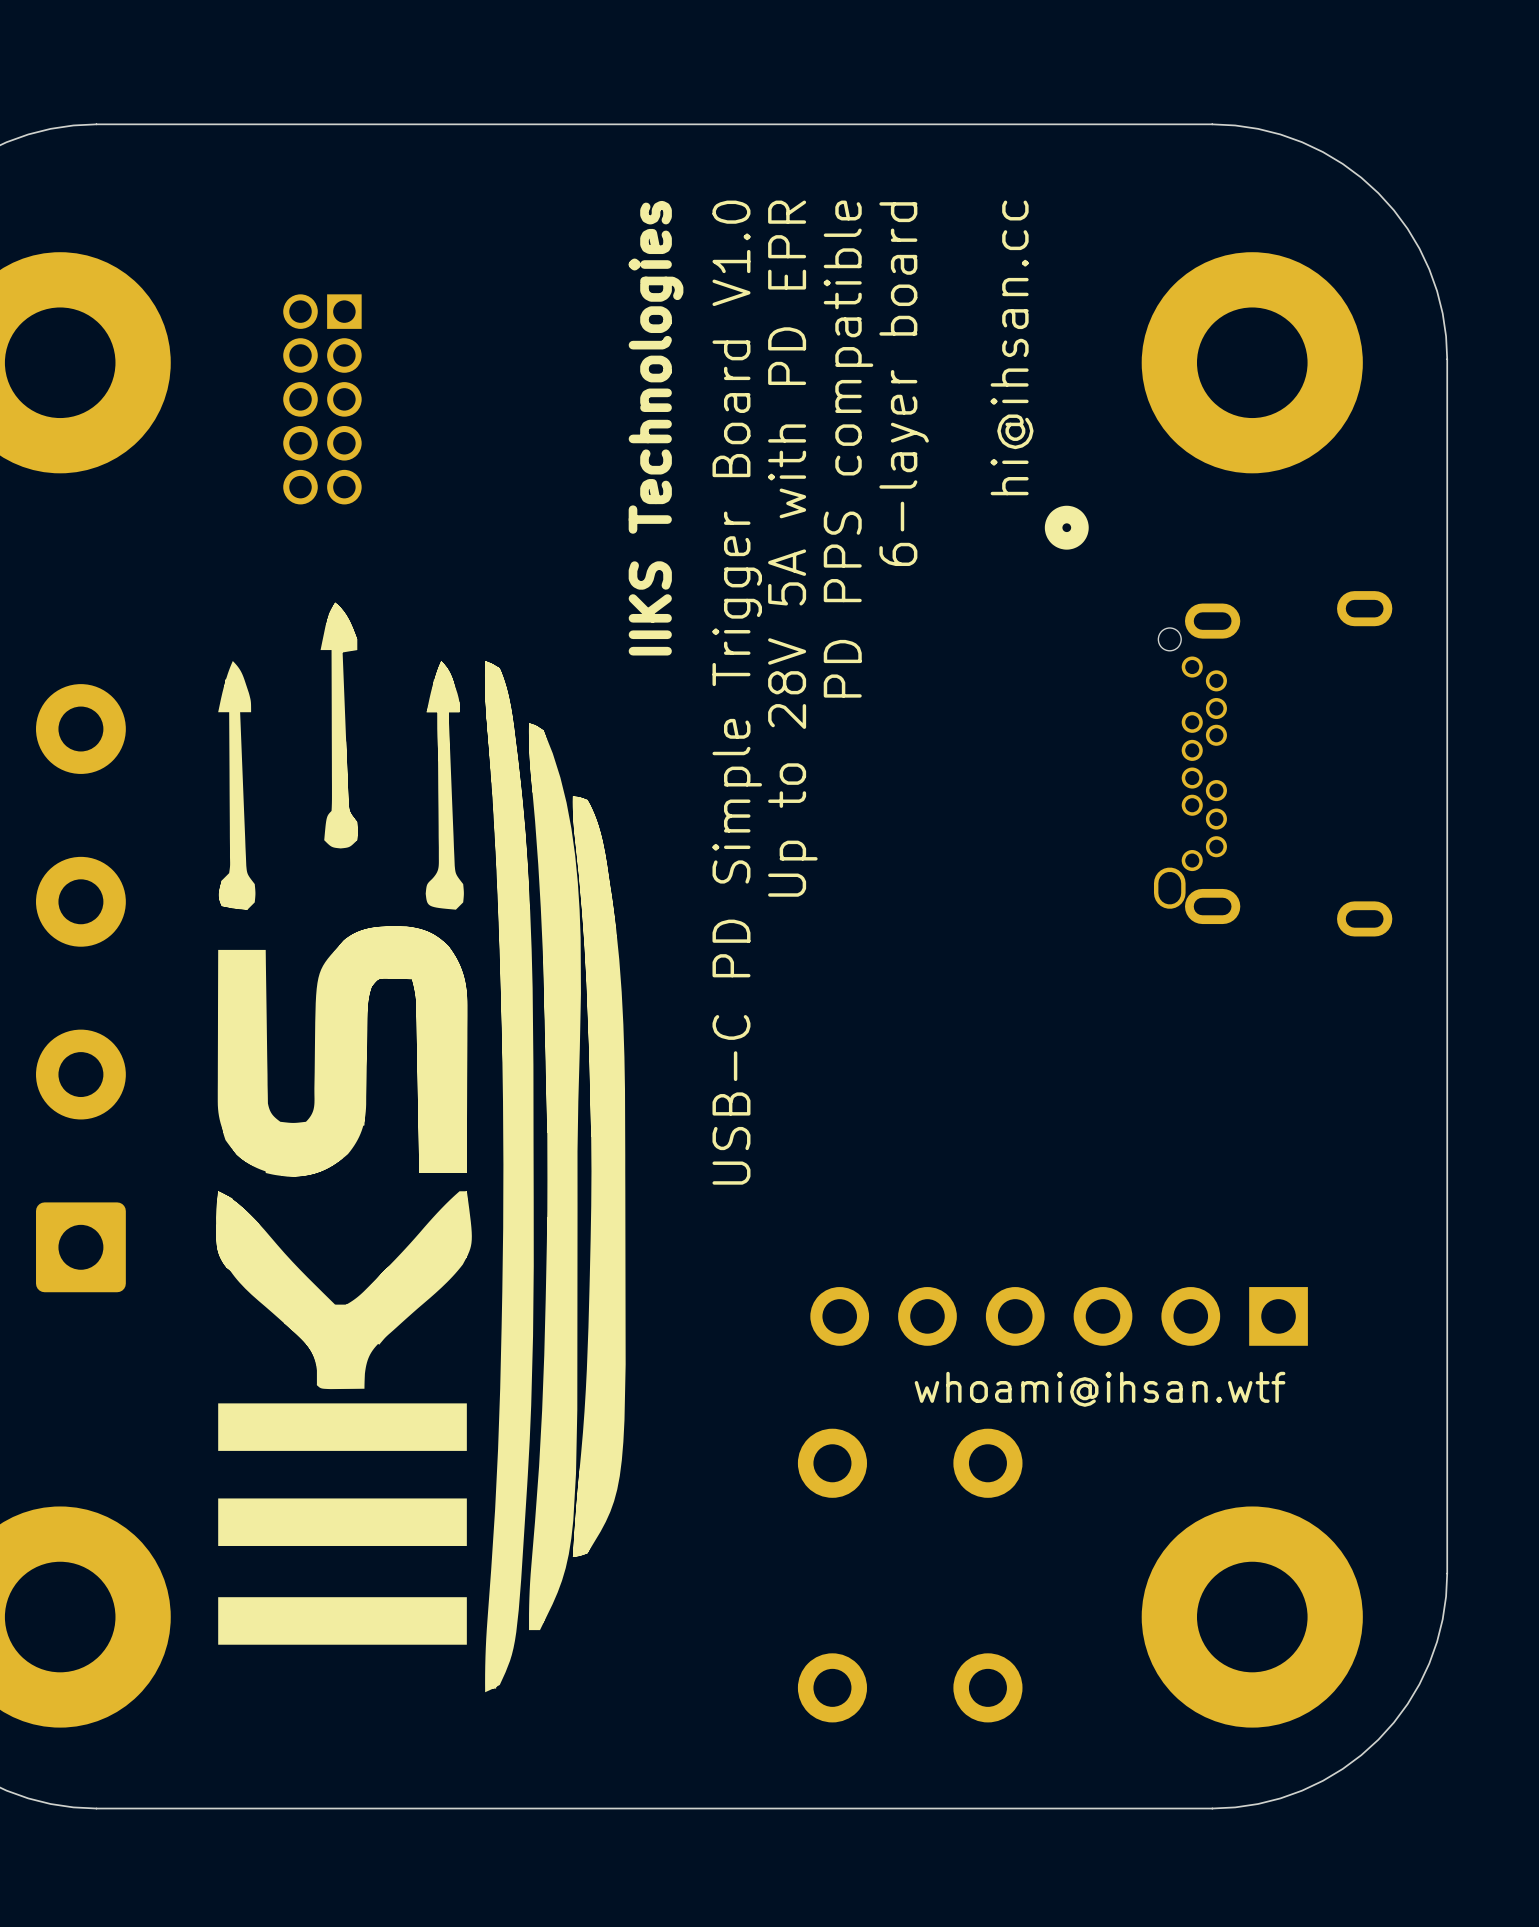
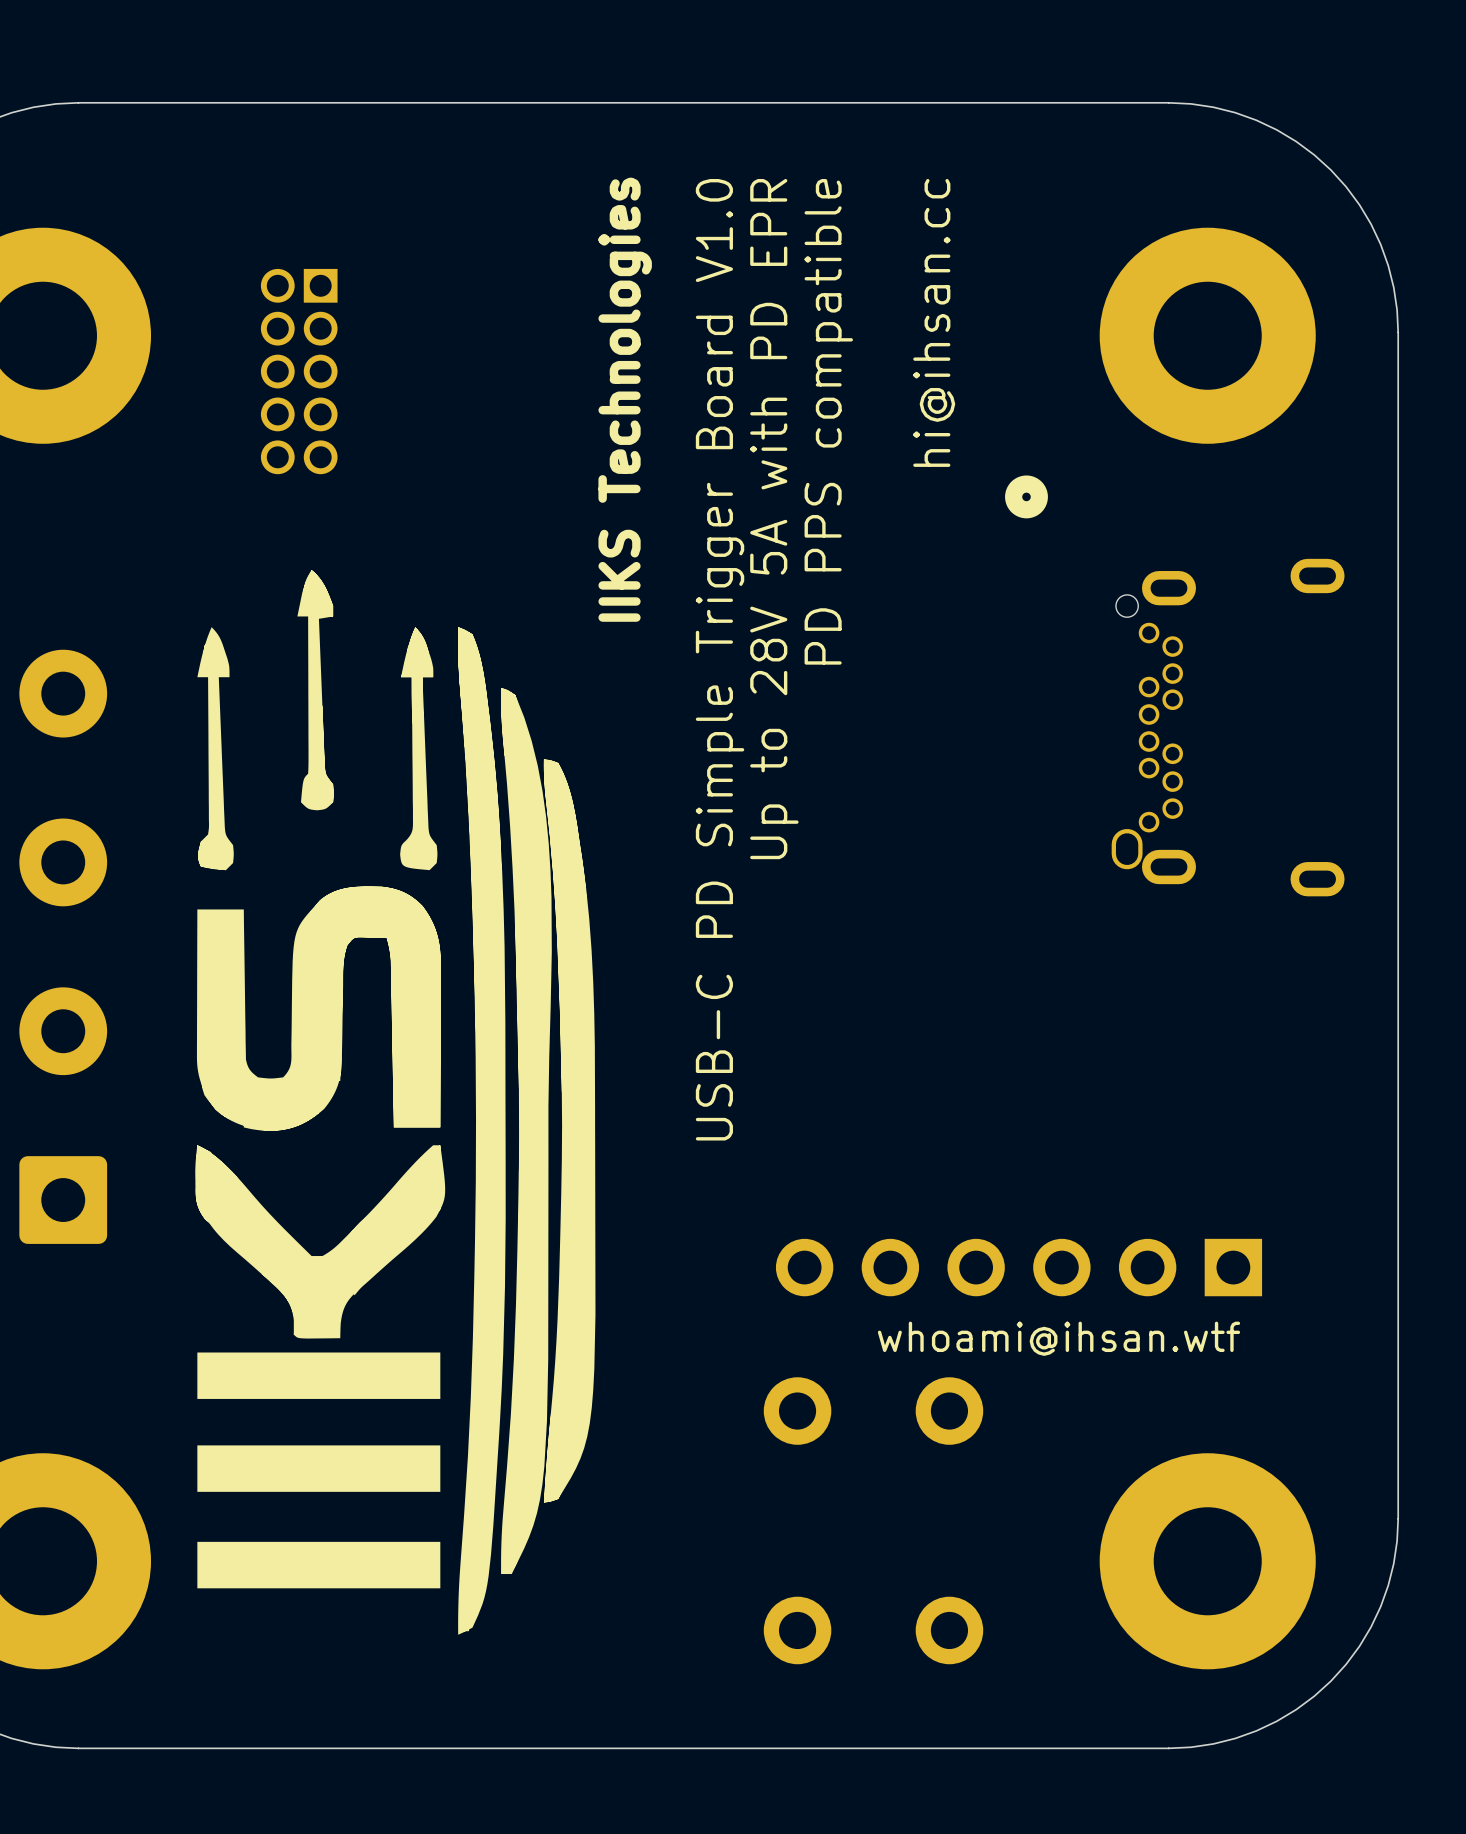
text position: hi@ihsan.cc (1012, 347) -> hi@ihsan.cc (934, 322)
text: 6-layer board (904, 384) -> none
text position: PD PPS compatible (848, 449) -> PD PPS compatible (828, 421)
text position: Up to 28V 5A with PD EPR (792, 548) -> Up to 28V 5A with PD EPR (774, 519)
text position: USB-C PD Simple Trigger Board V1.0 (737, 692) -> USB-C PD Simple Trigger Board V1.0 (720, 659)

